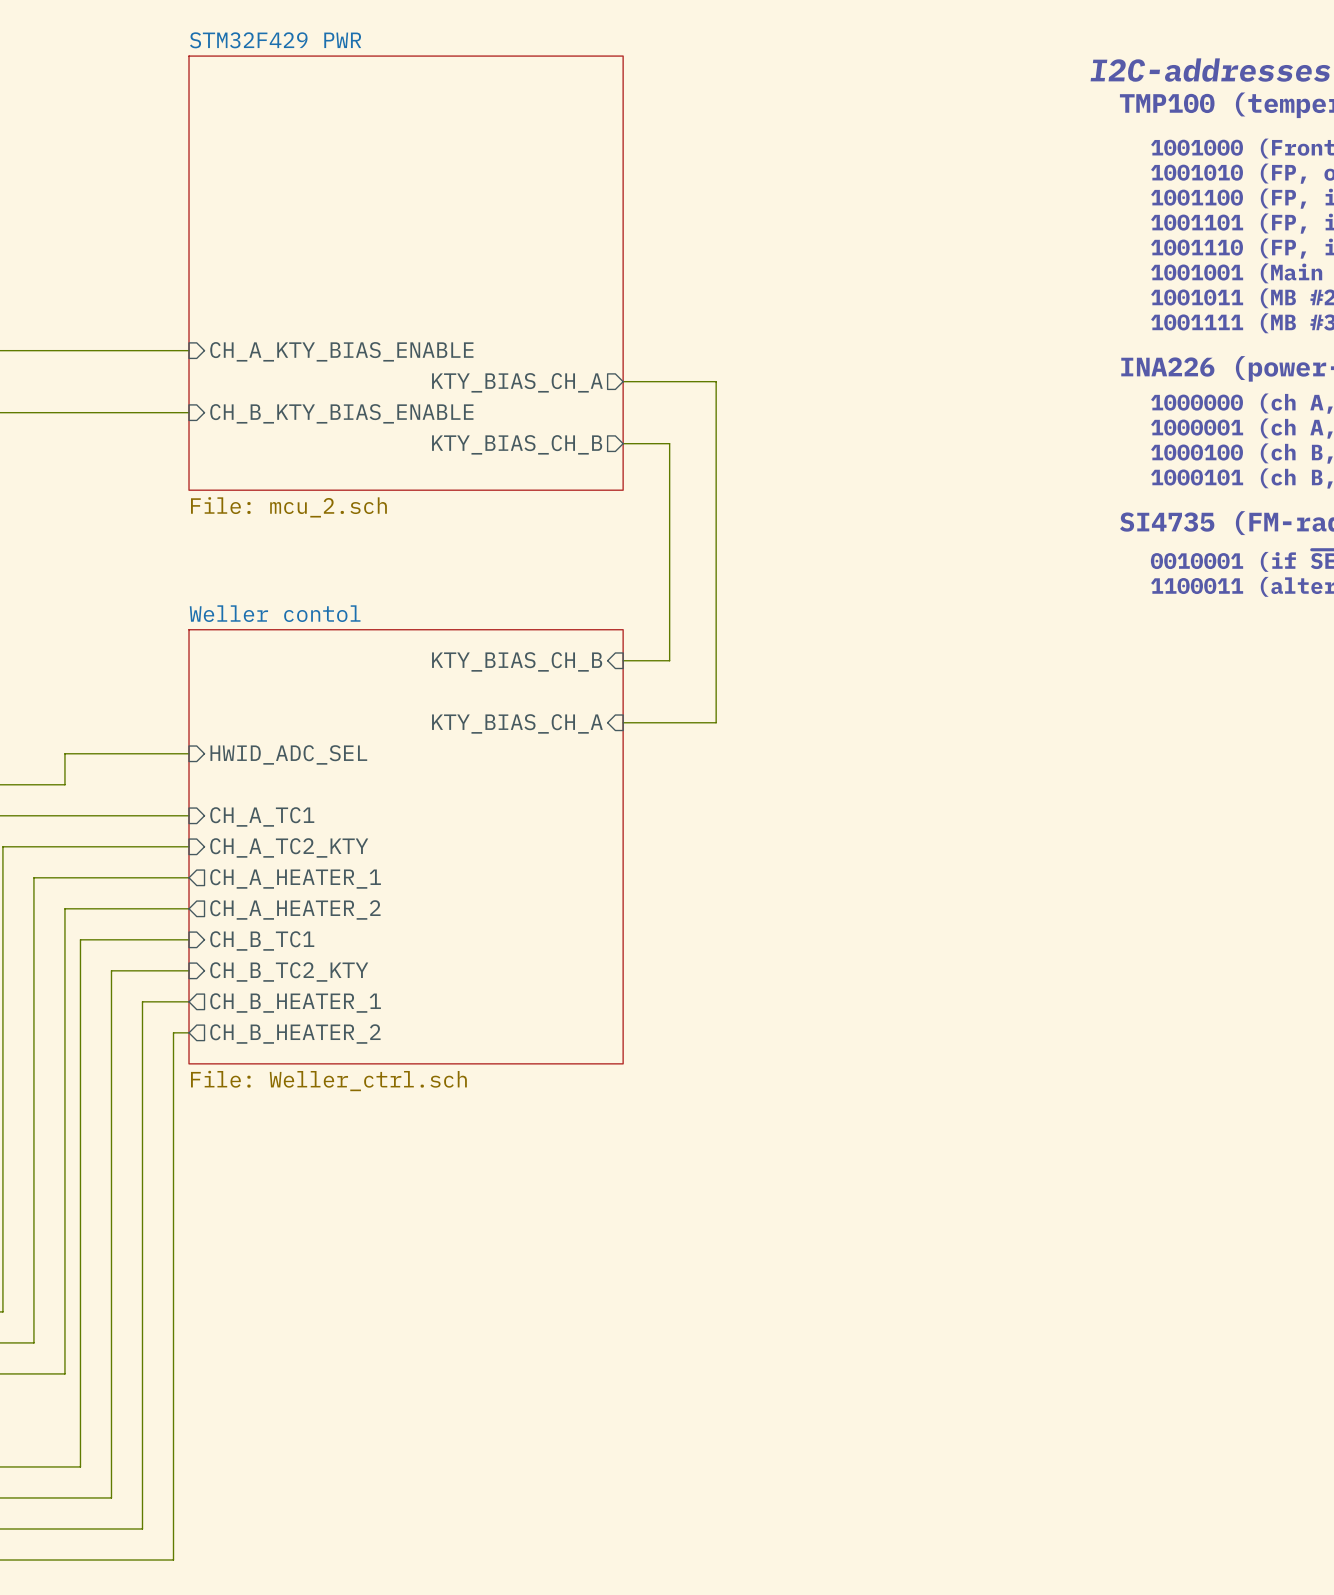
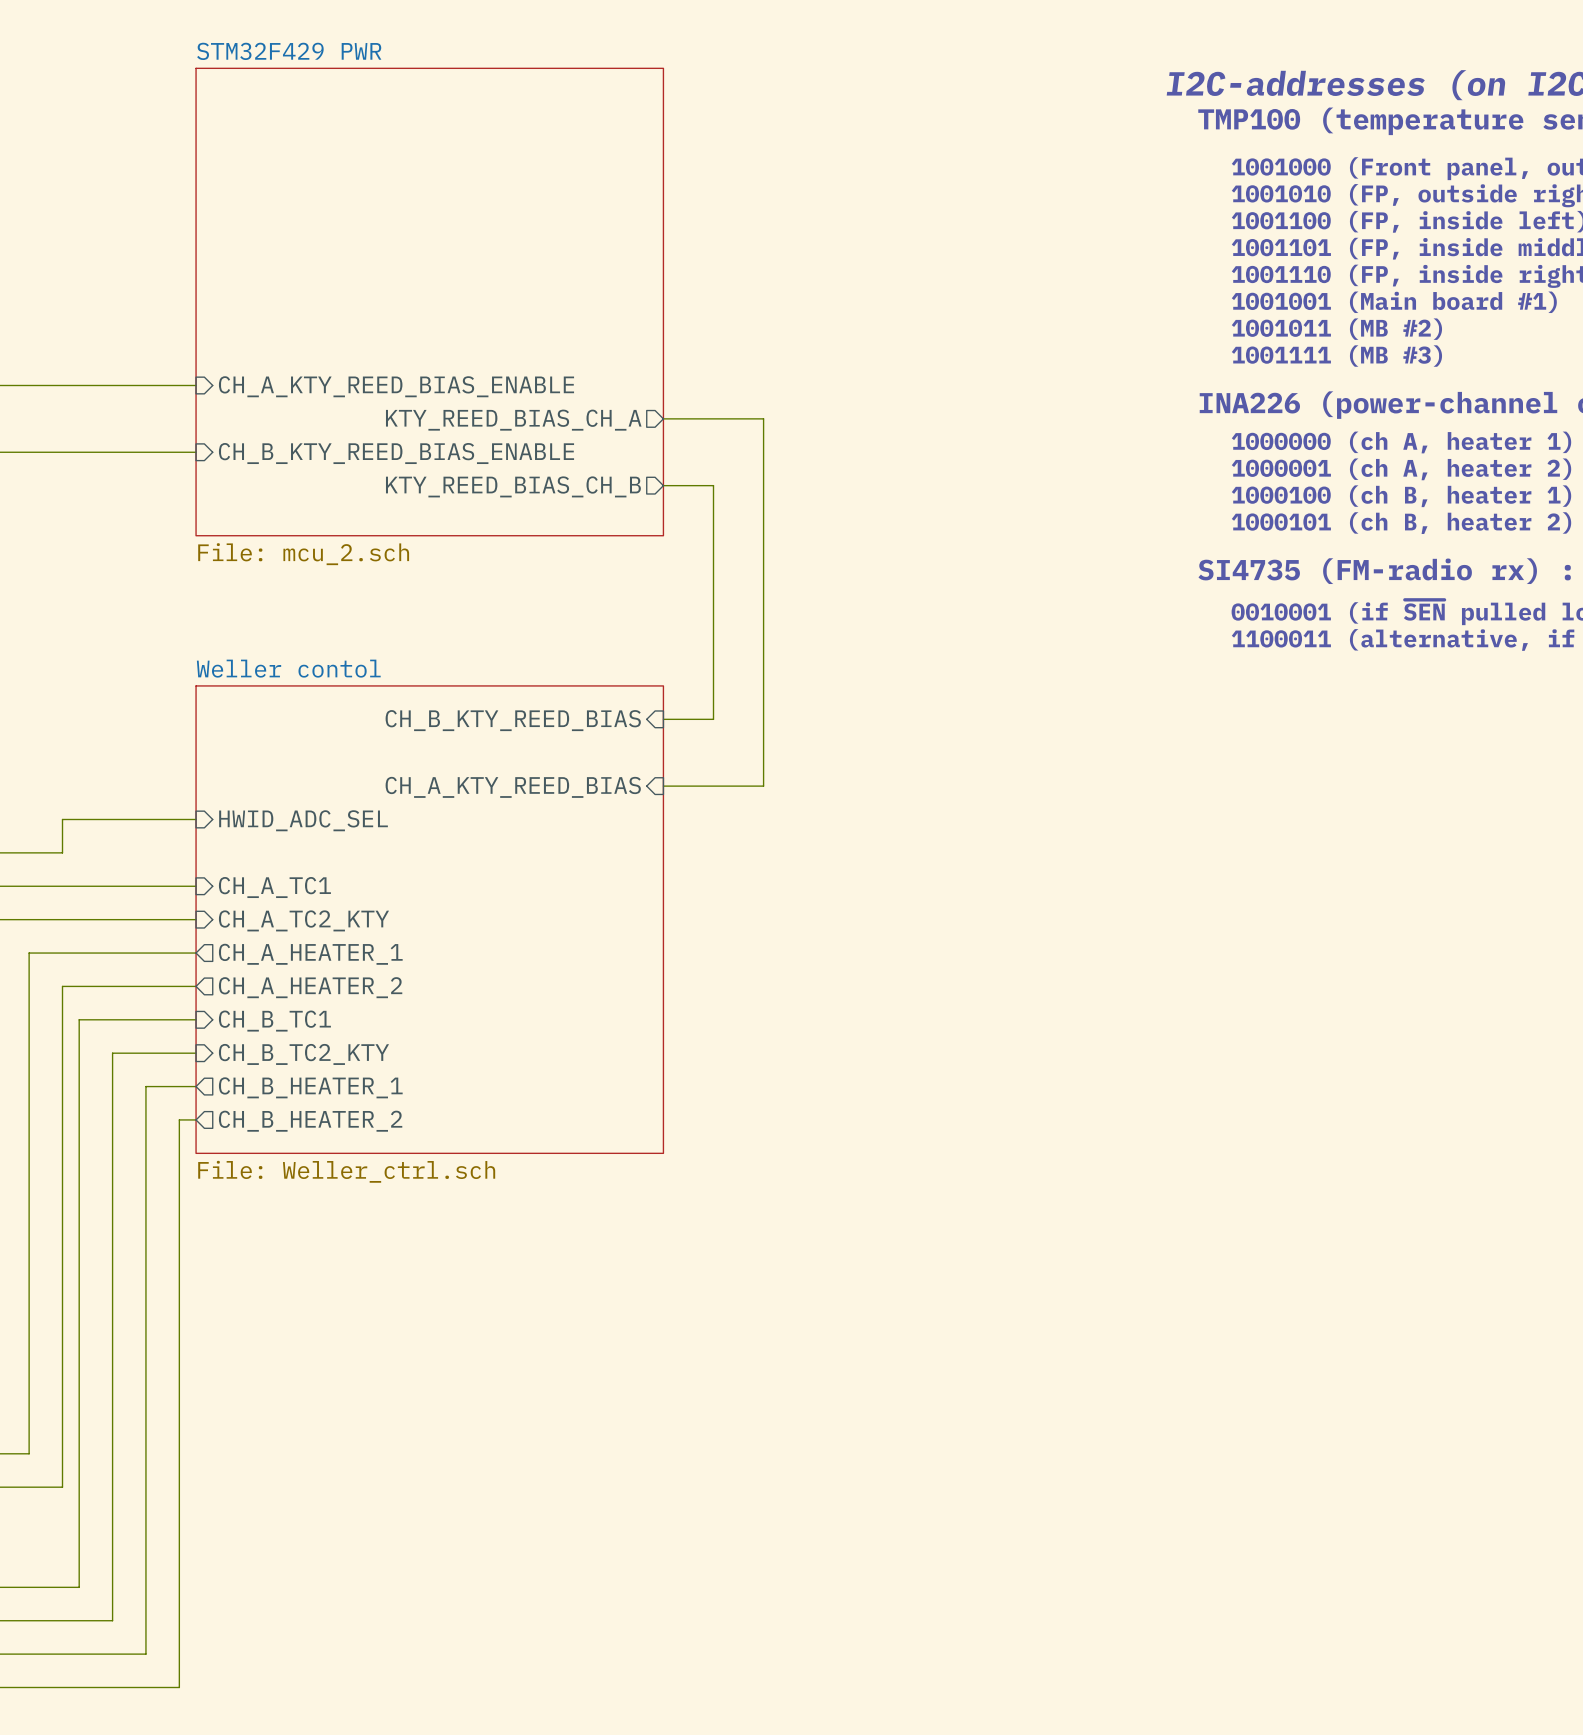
sheet pin: CH_A_KTY_BIAS_ENABLE (341, 351) -> CH_A_KTY_REED_BIAS_ENABLE (396, 386)
sheet pin: KTY_BIAS_CH_A (517, 382) -> KTY_REED_BIAS_CH_A (513, 420)
sheet pin: CH_B_KTY_BIAS_ENABLE (341, 413) -> CH_B_KTY_REED_BIAS_ENABLE (396, 453)
sheet pin: KTY_BIAS_CH_B (517, 444) -> KTY_REED_BIAS_CH_B (513, 486)
sheet pin: KTY_BIAS_CH_B (517, 661) -> CH_B_KTY_REED_BIAS (513, 720)
sheet pin: KTY_BIAS_CH_A (517, 723) -> CH_A_KTY_REED_BIAS (513, 787)

